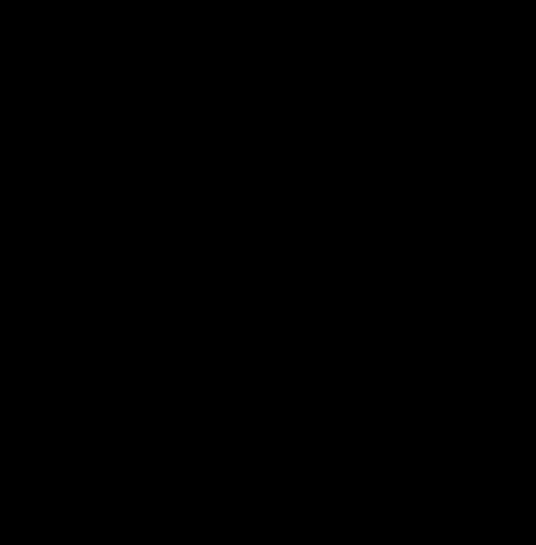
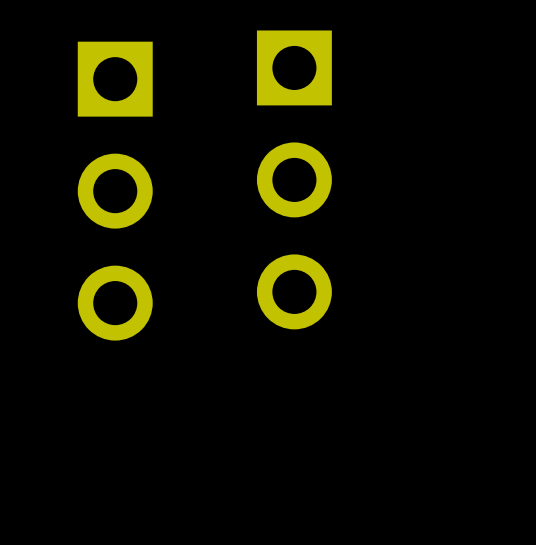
part: none -> (294, 179)
part: none -> (115, 191)

